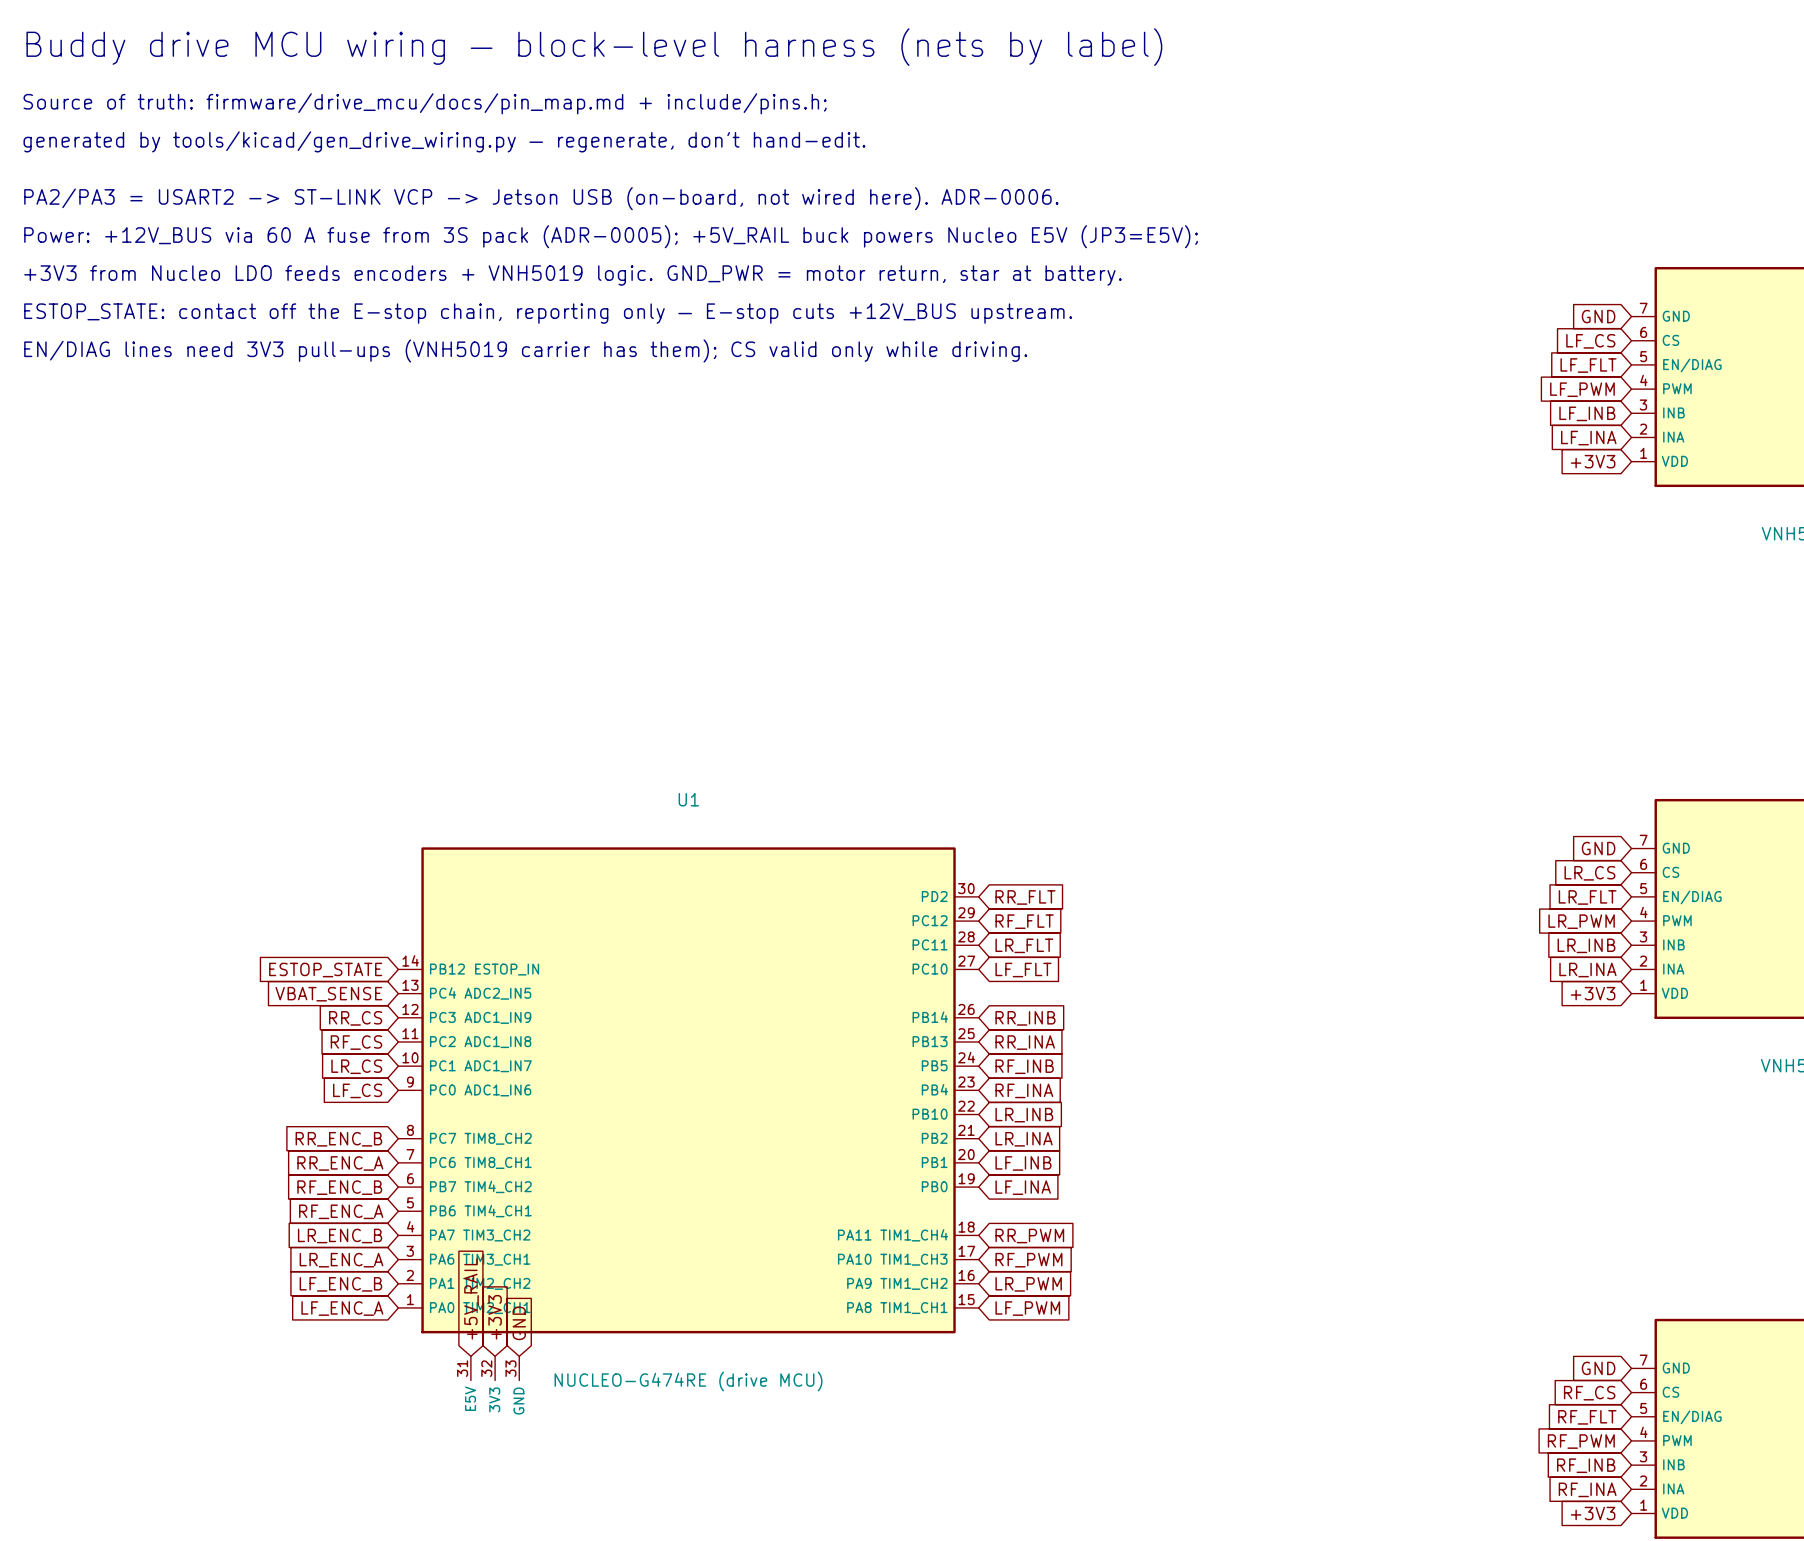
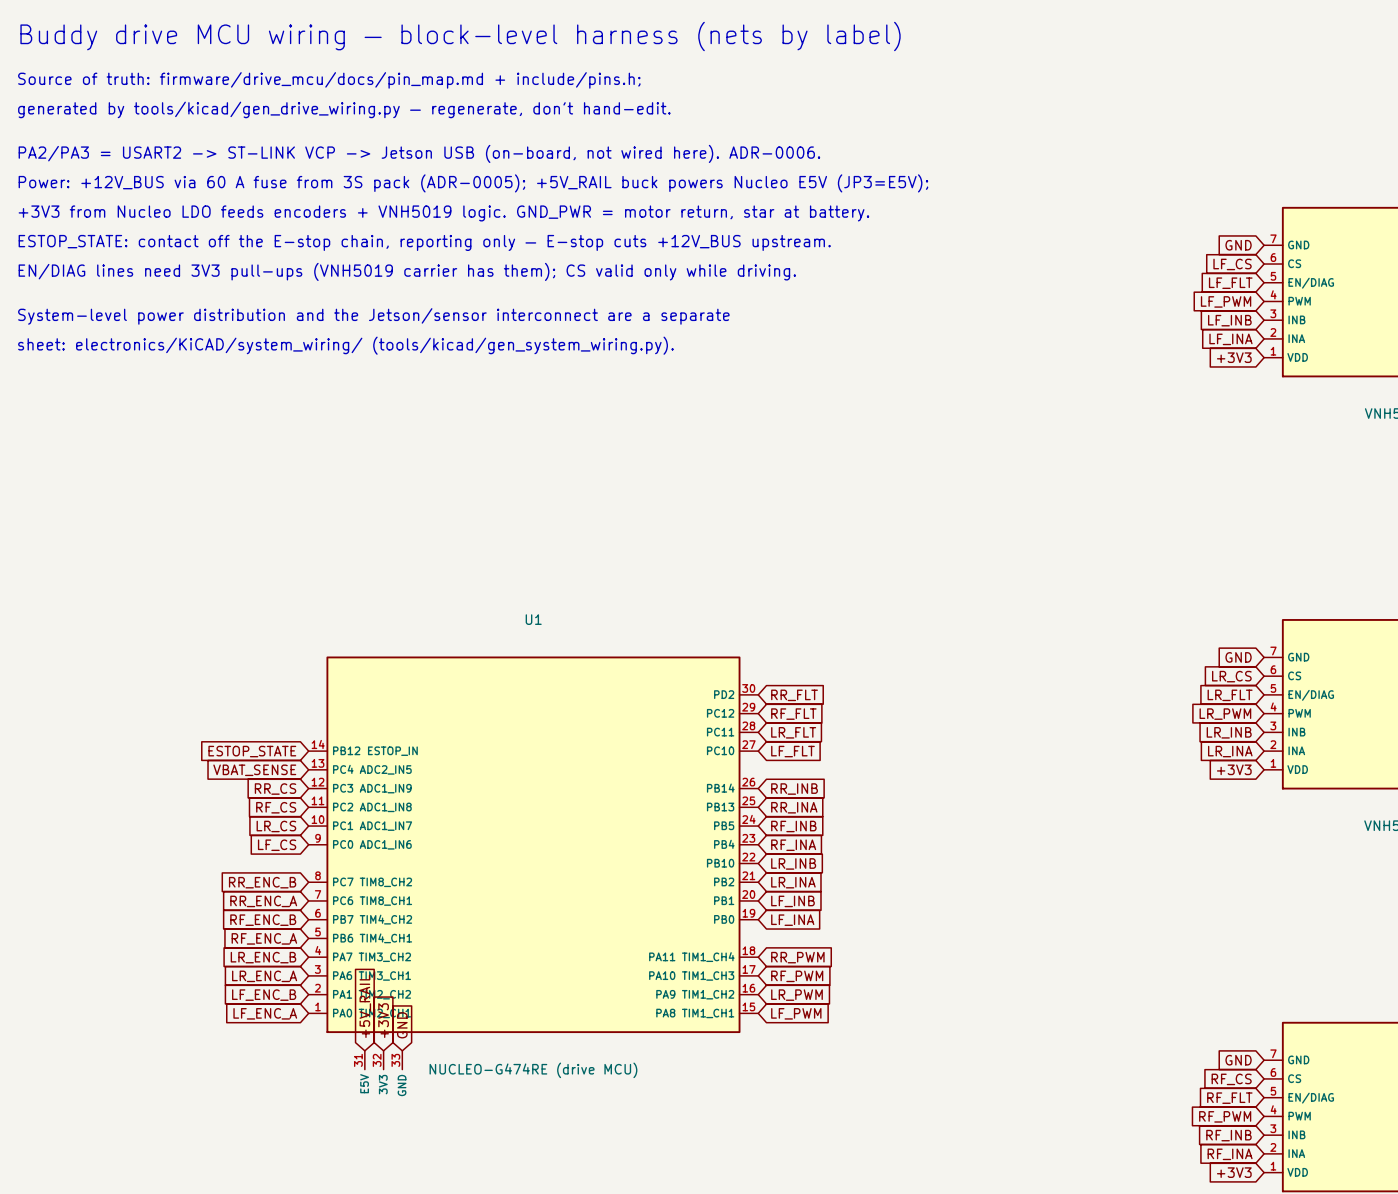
text: none -> System-level power distribution and the Jetson/sensor interconnect are a separate (373, 316)
text: none -> sheet: electronics/KiCAD/system_wiring/ (tools/kicad/gen_system_wiring.py). (345, 345)

